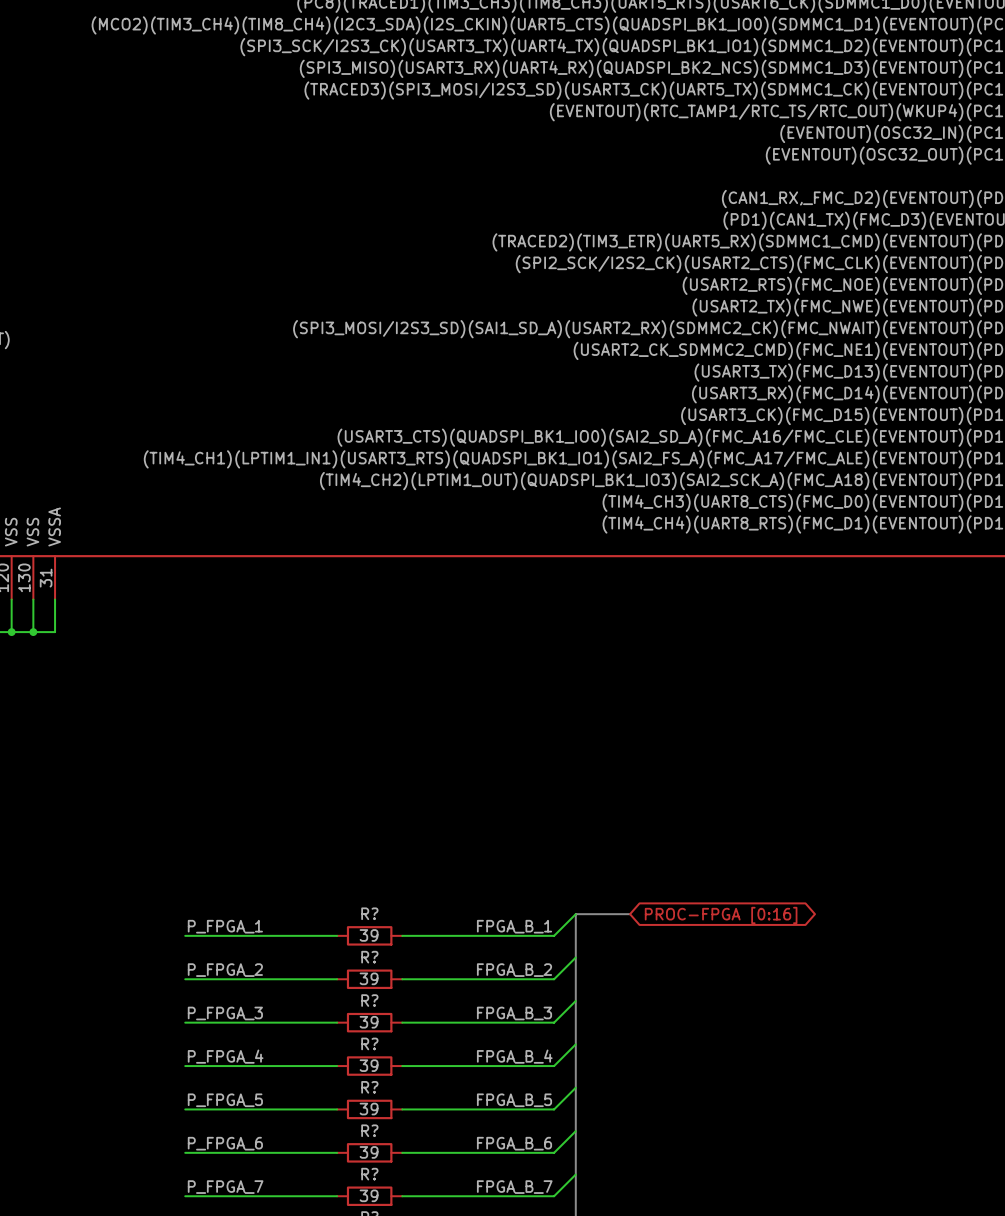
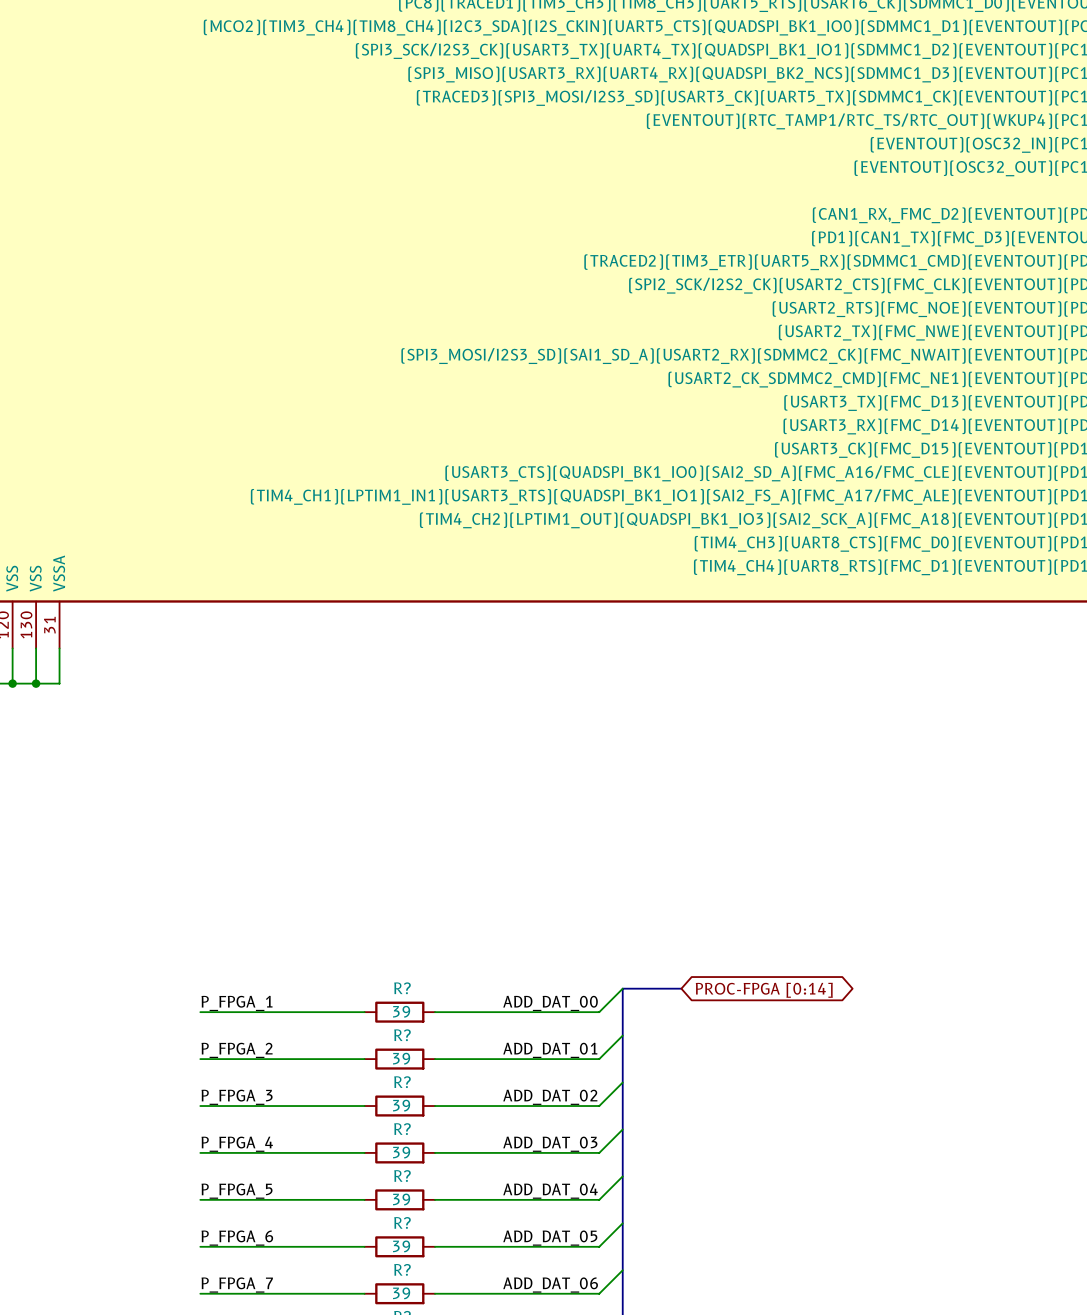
global label: PROC-FPGA [0:16] (721, 915) -> PROC-FPGA [0:14] (764, 990)
label: FPGA_B_1 (514, 926) -> ADD_DAT_00 (550, 1003)
label: FPGA_B_2 (514, 970) -> ADD_DAT_01 (550, 1050)
label: FPGA_B_3 (514, 1013) -> ADD_DAT_02 (550, 1097)
label: FPGA_B_4 (514, 1056) -> ADD_DAT_03 (550, 1144)
label: FPGA_B_5 (514, 1100) -> ADD_DAT_04 (550, 1191)
label: FPGA_B_6 (514, 1143) -> ADD_DAT_05 (550, 1238)
label: FPGA_B_7 (514, 1187) -> ADD_DAT_06 (550, 1285)

